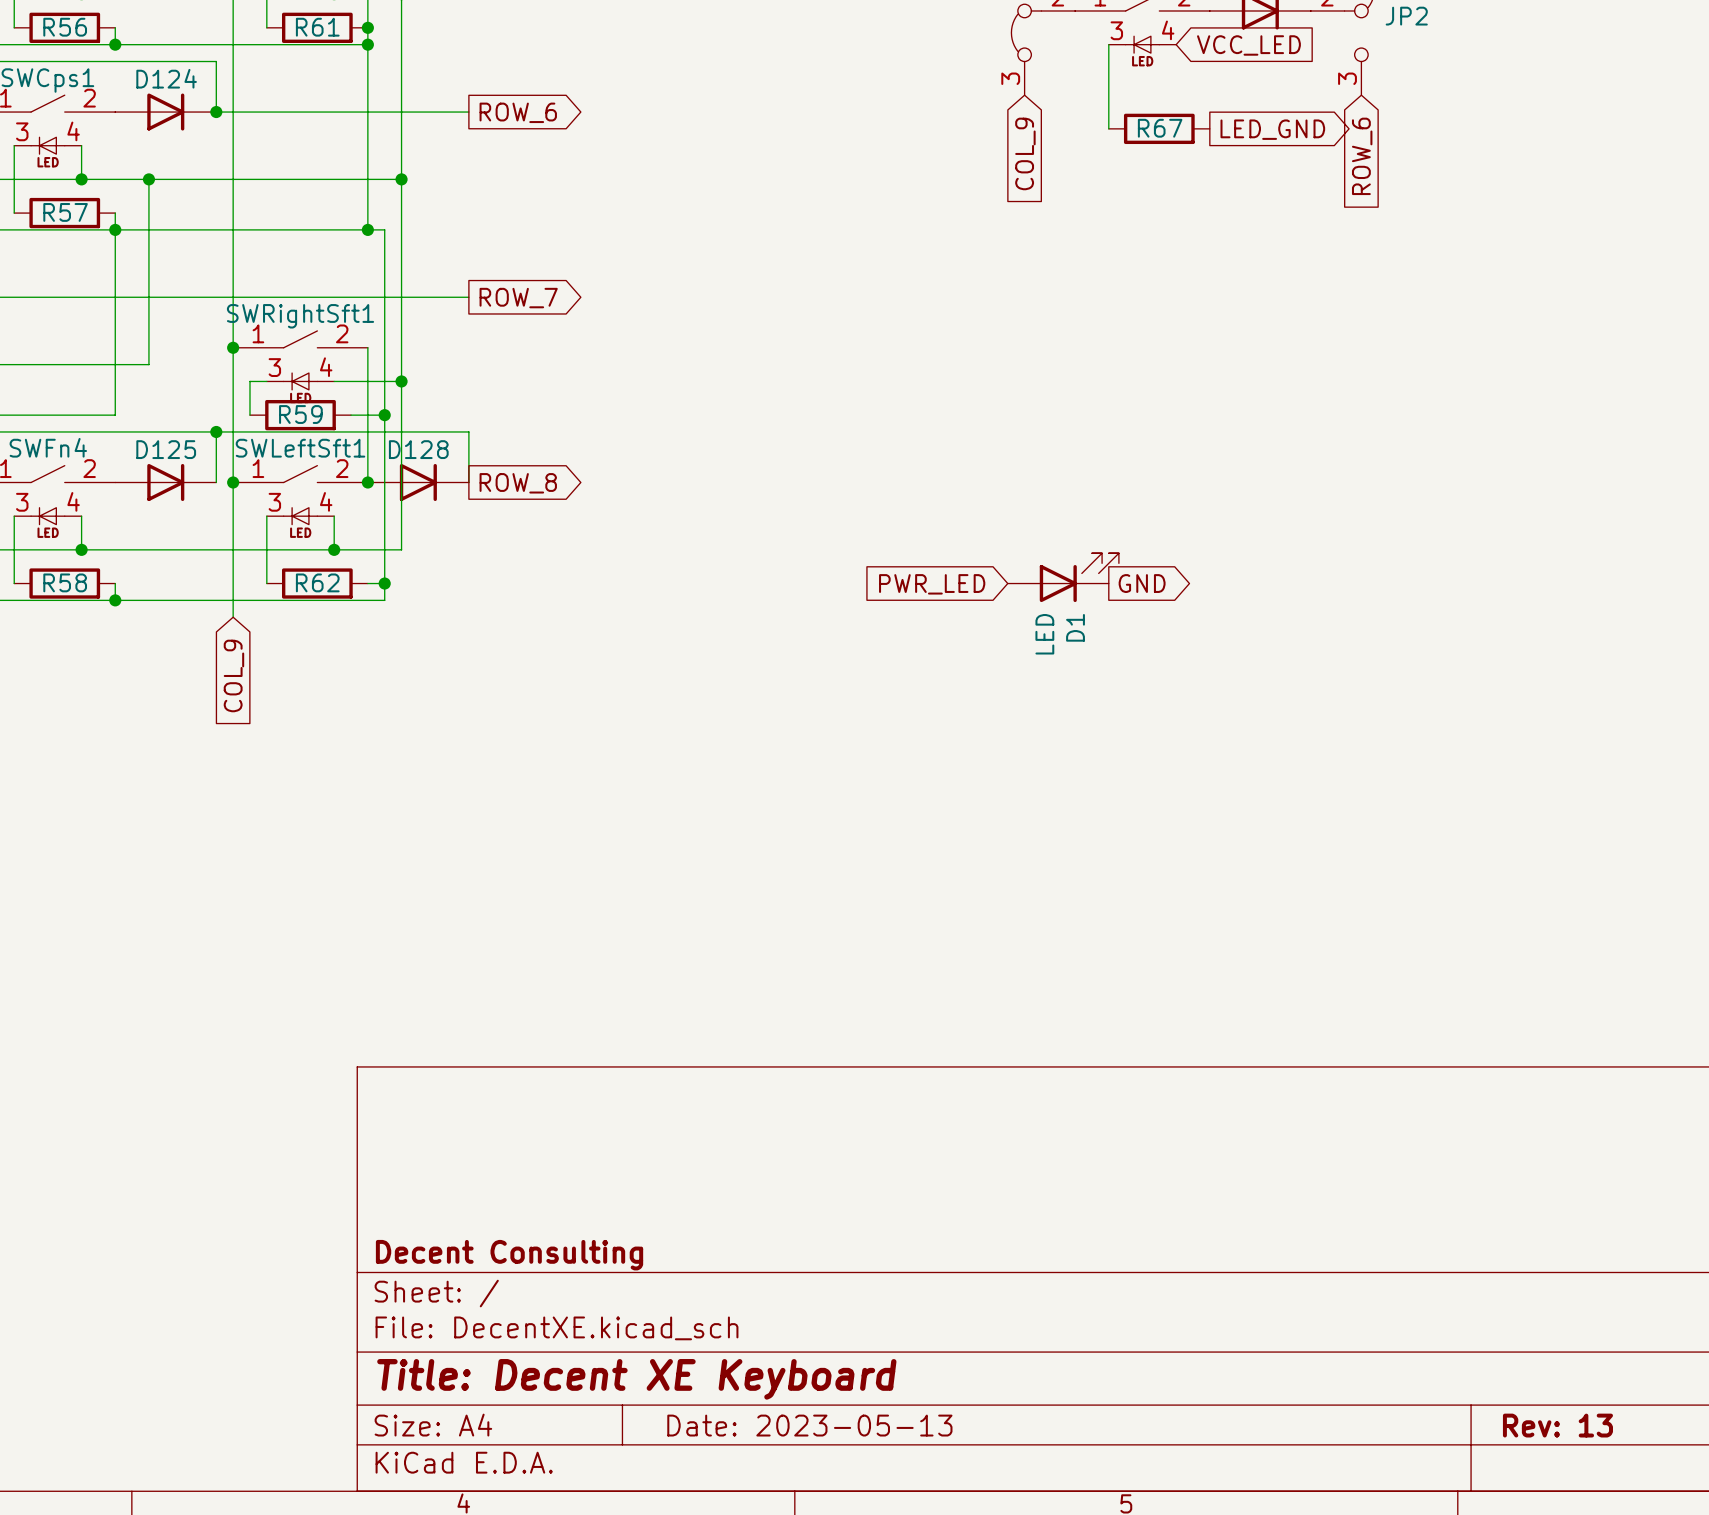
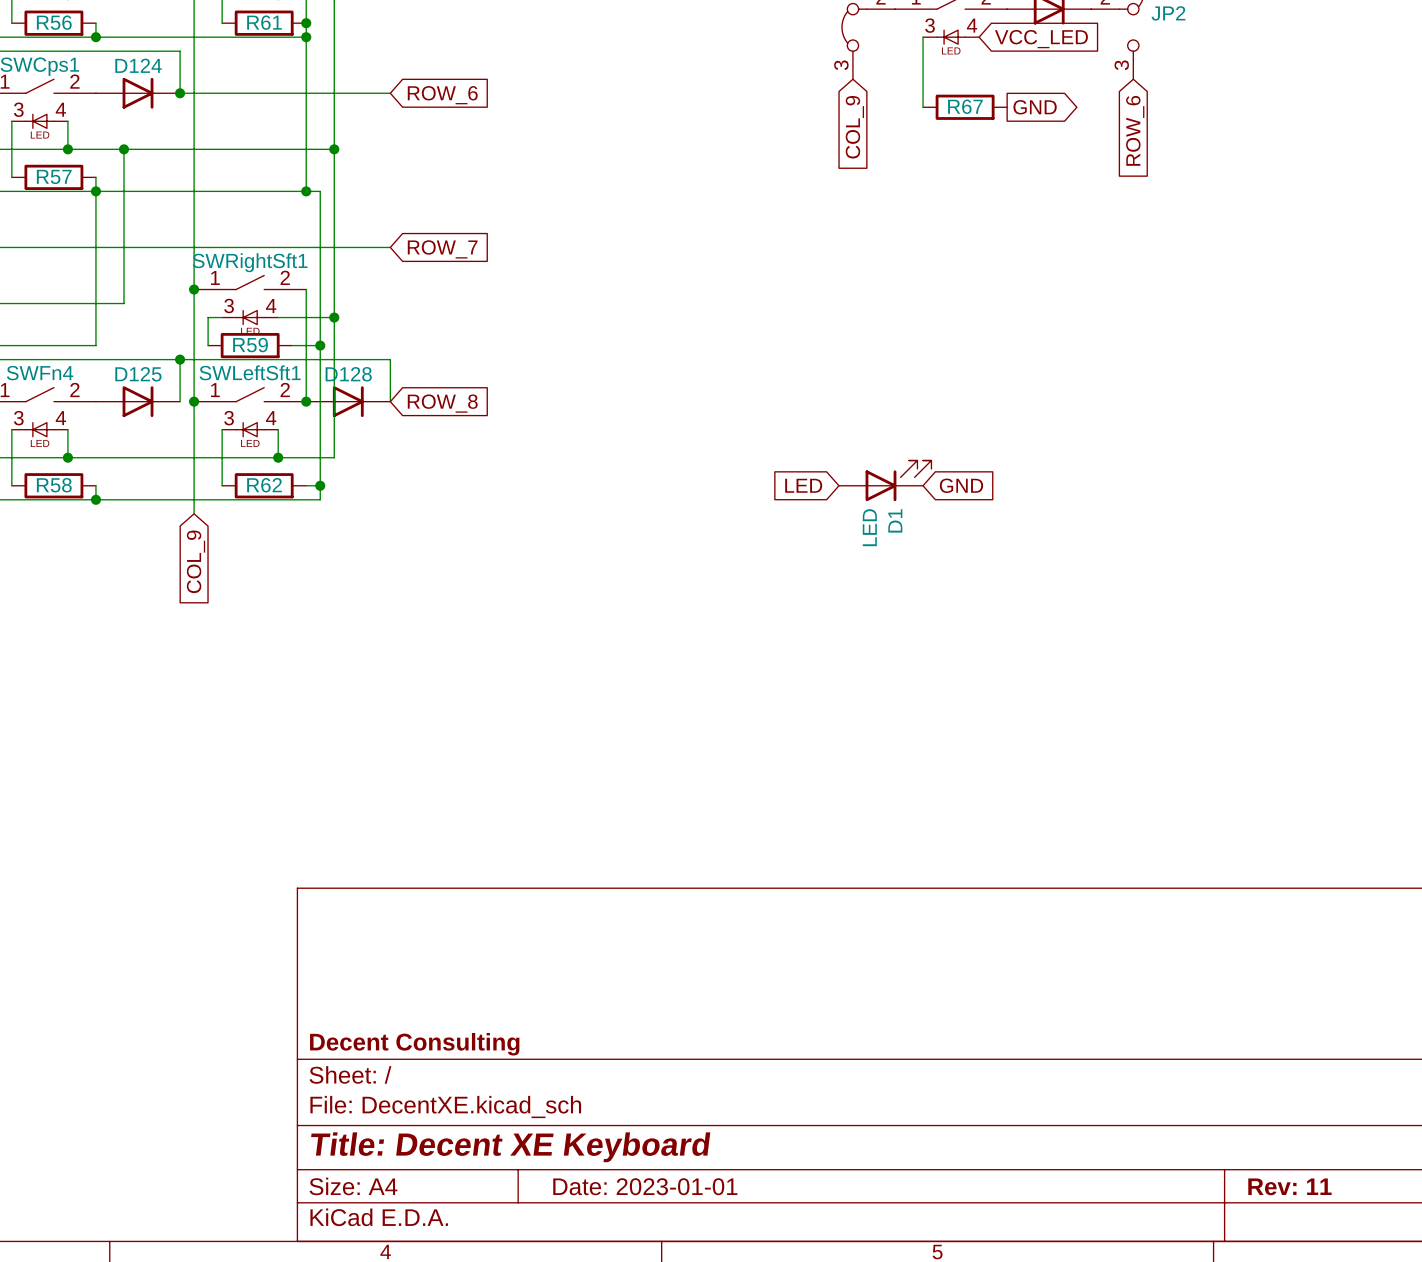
global label shape: output (518, 112) -> input (442, 95)
global label: LED_GND (1272, 129) -> GND (1035, 107)
global label shape: output (518, 298) -> input (442, 249)
global label shape: output (518, 483) -> input (442, 403)
global label shape: output (1142, 583) -> input (961, 485)
global label: PWR_LED (932, 584) -> LED (803, 485)
title block: Date: 2023-05-13 (809, 1425) -> Date: 2023-01-01 (645, 1186)
title block: Rev: 13 (1557, 1425) -> Rev: 11 (1289, 1186)

